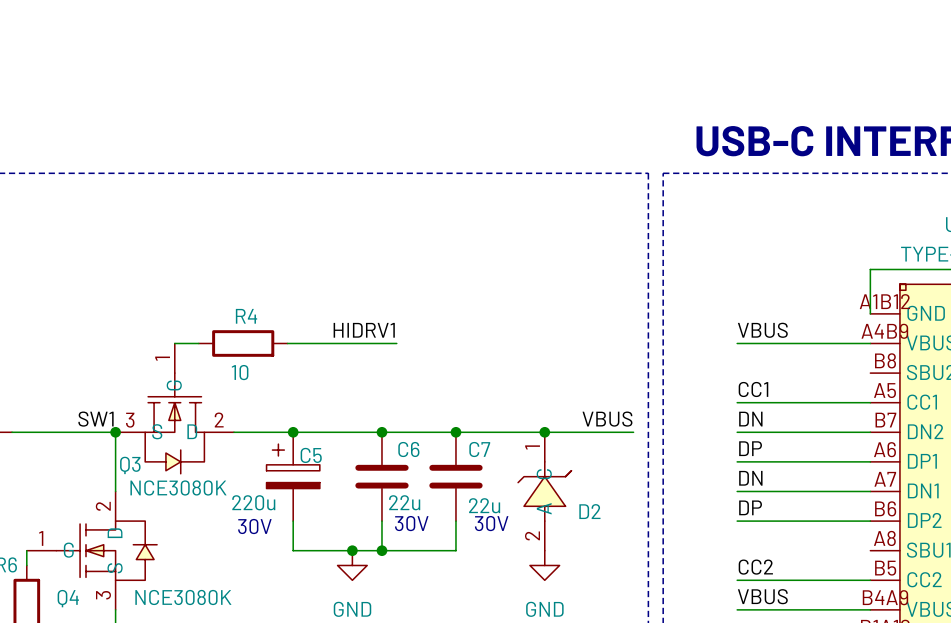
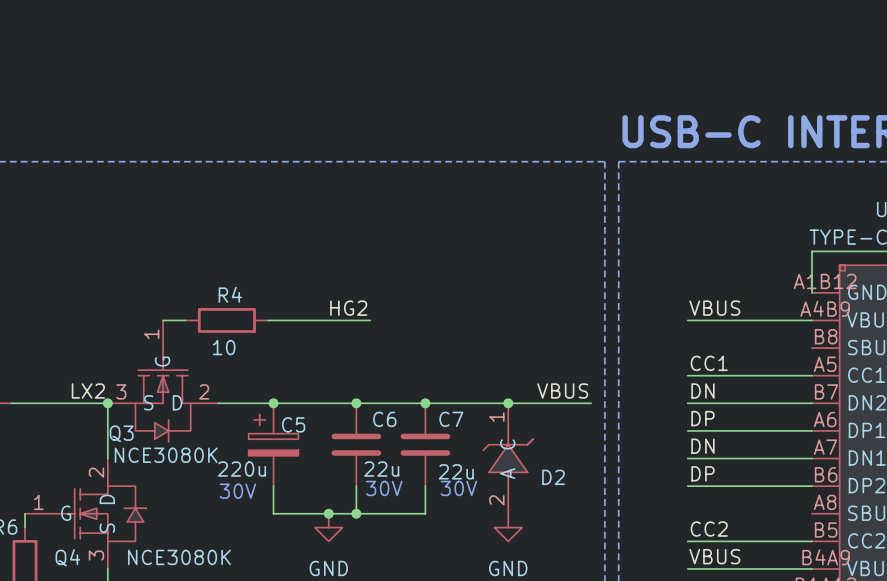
label: HIDRV1 (364, 330) -> HG2 (348, 308)
label: SW1 (96, 419) -> LX2 (88, 390)

